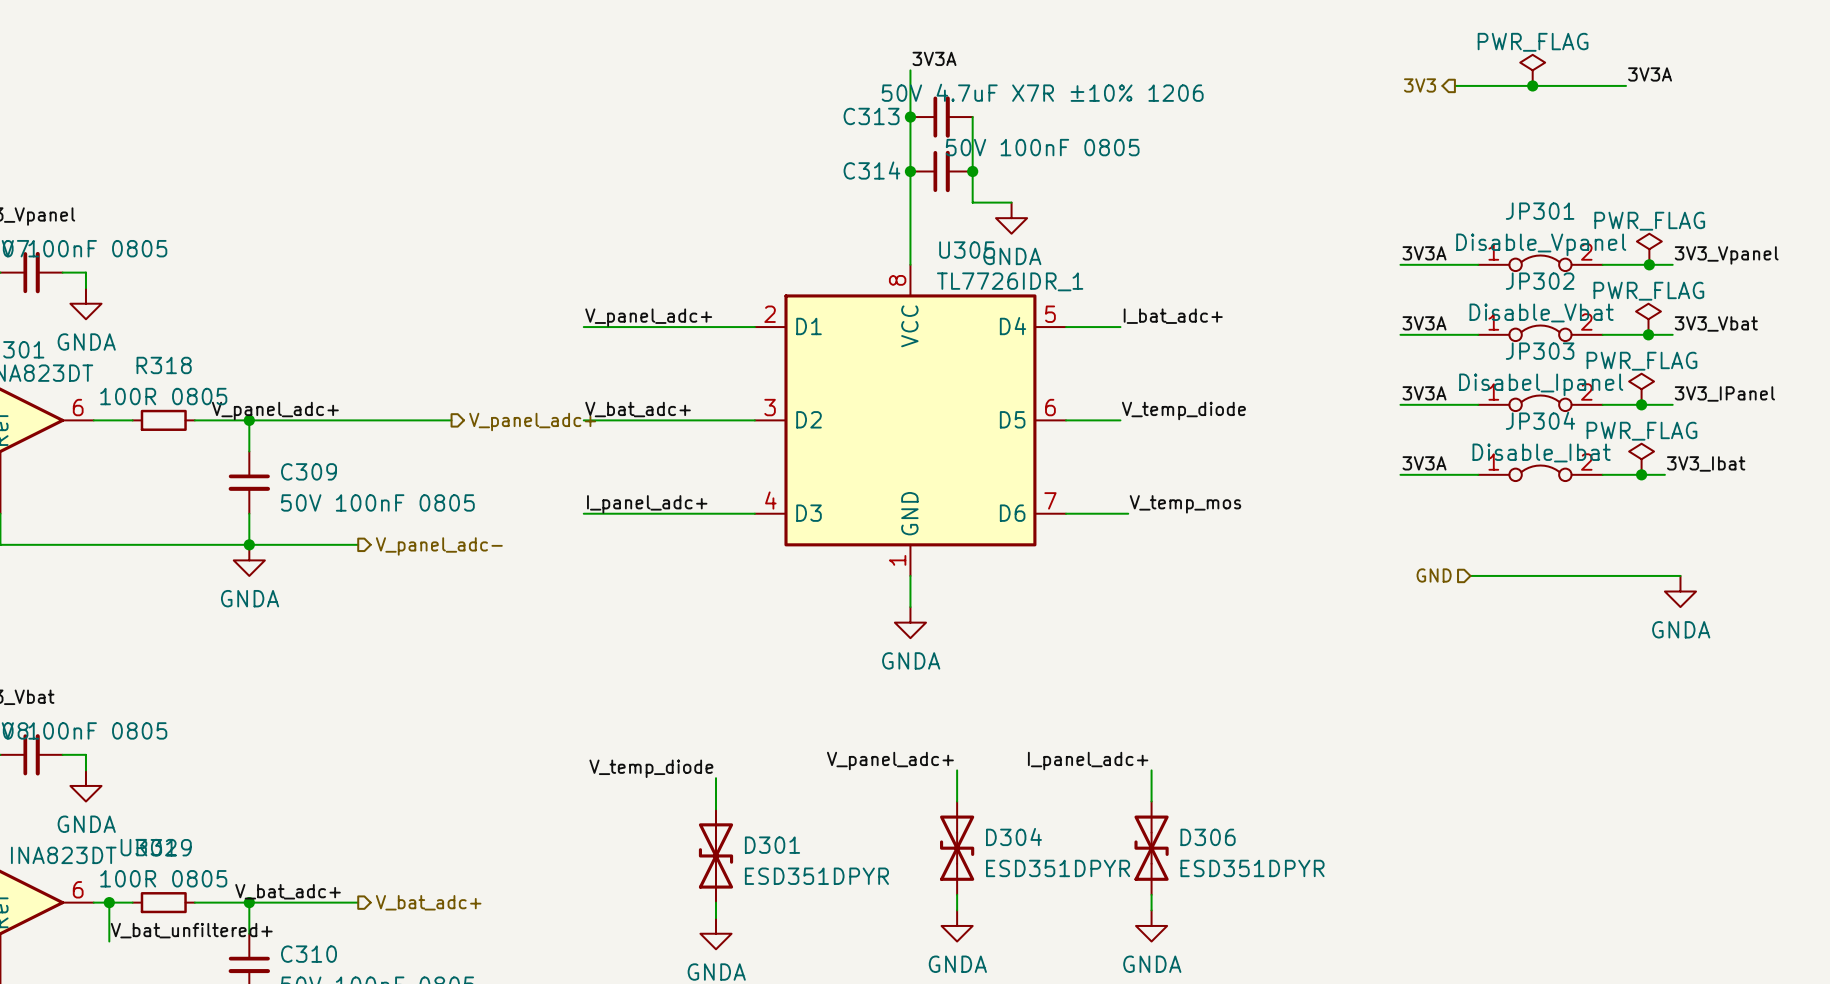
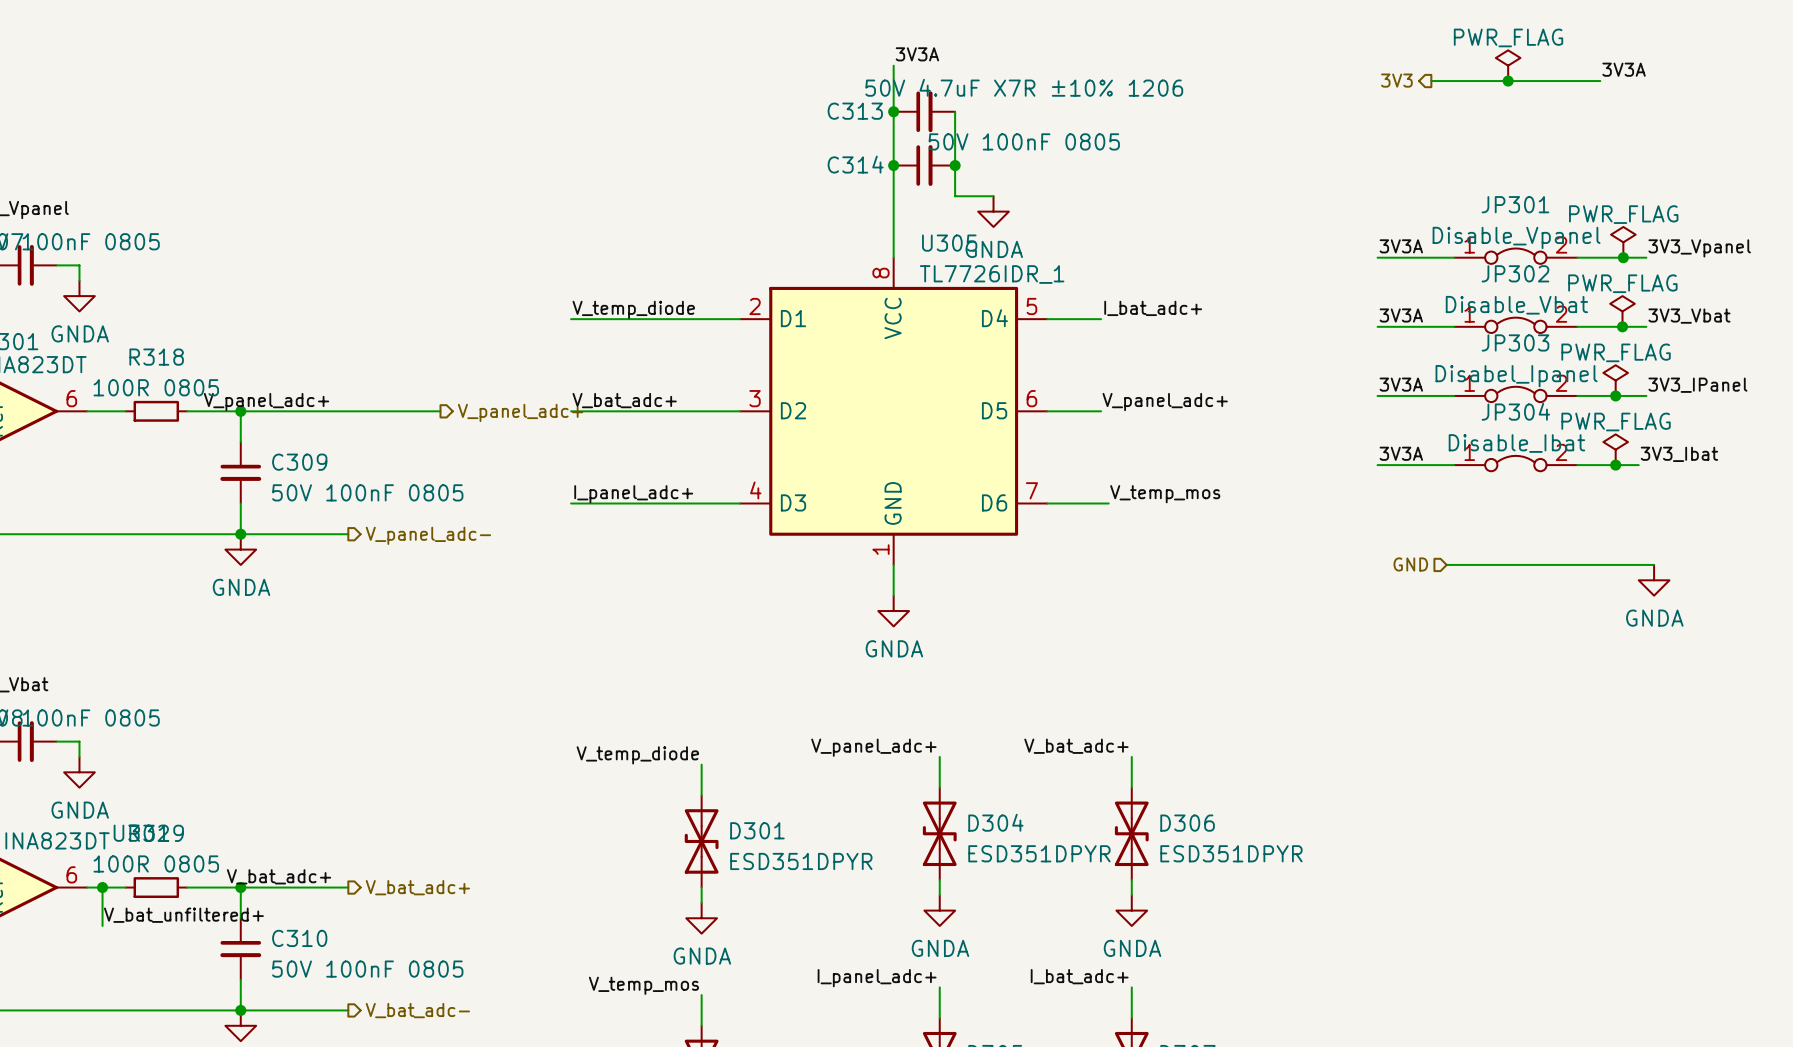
label: V_panel_adc+ (648, 317) -> V_temp_diode (633, 309)
label: V_temp_diode (1183, 410) -> V_panel_adc+ (1165, 402)
label: I_panel_adc+ (1088, 760) -> V_bat_adc+ (1076, 746)

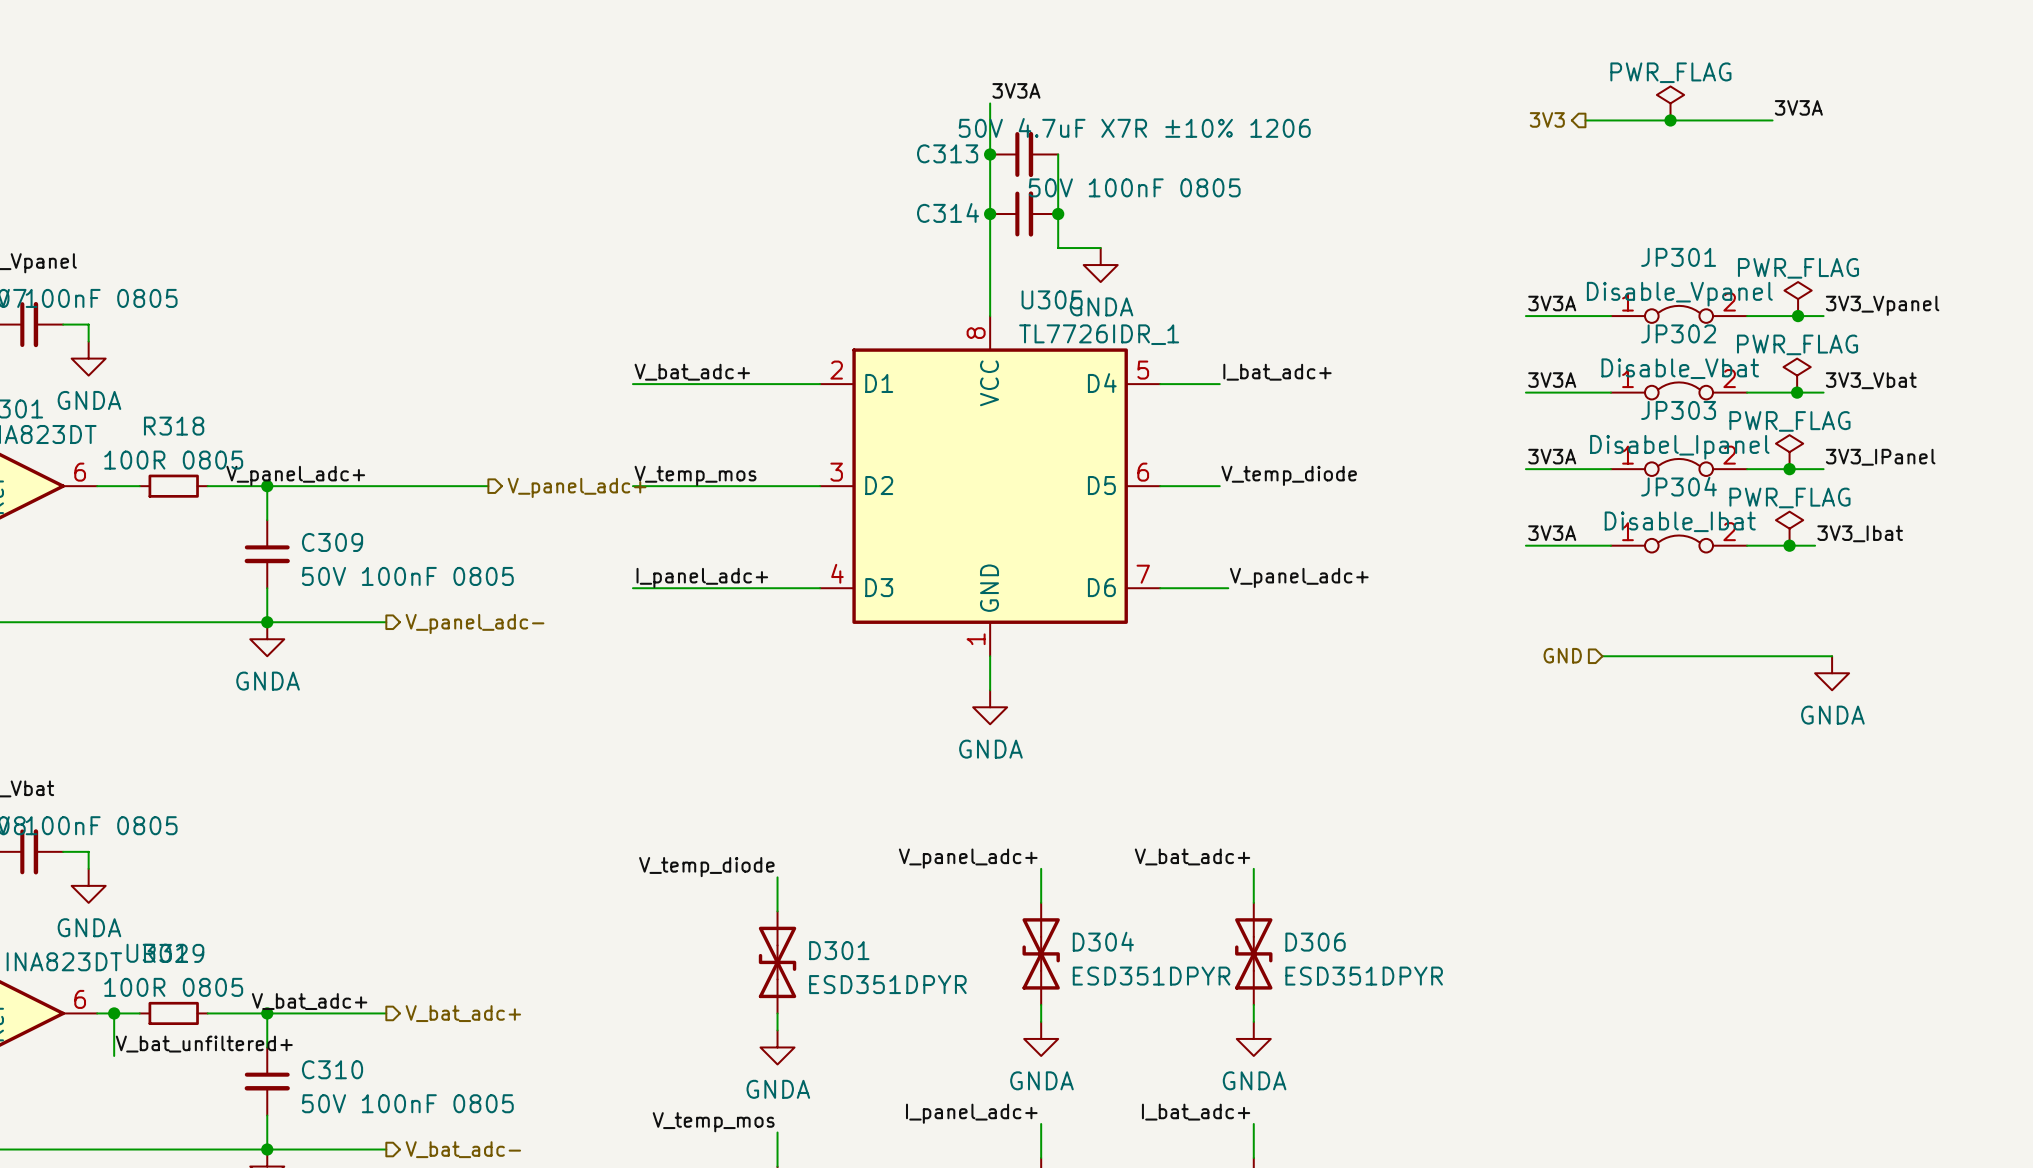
label: V_temp_diode (633, 309) -> V_bat_adc+ (692, 372)
label: V_bat_adc+ (624, 400) -> V_temp_mos (695, 475)
label: V_panel_adc+ (1165, 402) -> V_temp_diode (1289, 475)
label: V_temp_mos (1165, 494) -> V_panel_adc+ (1299, 577)

